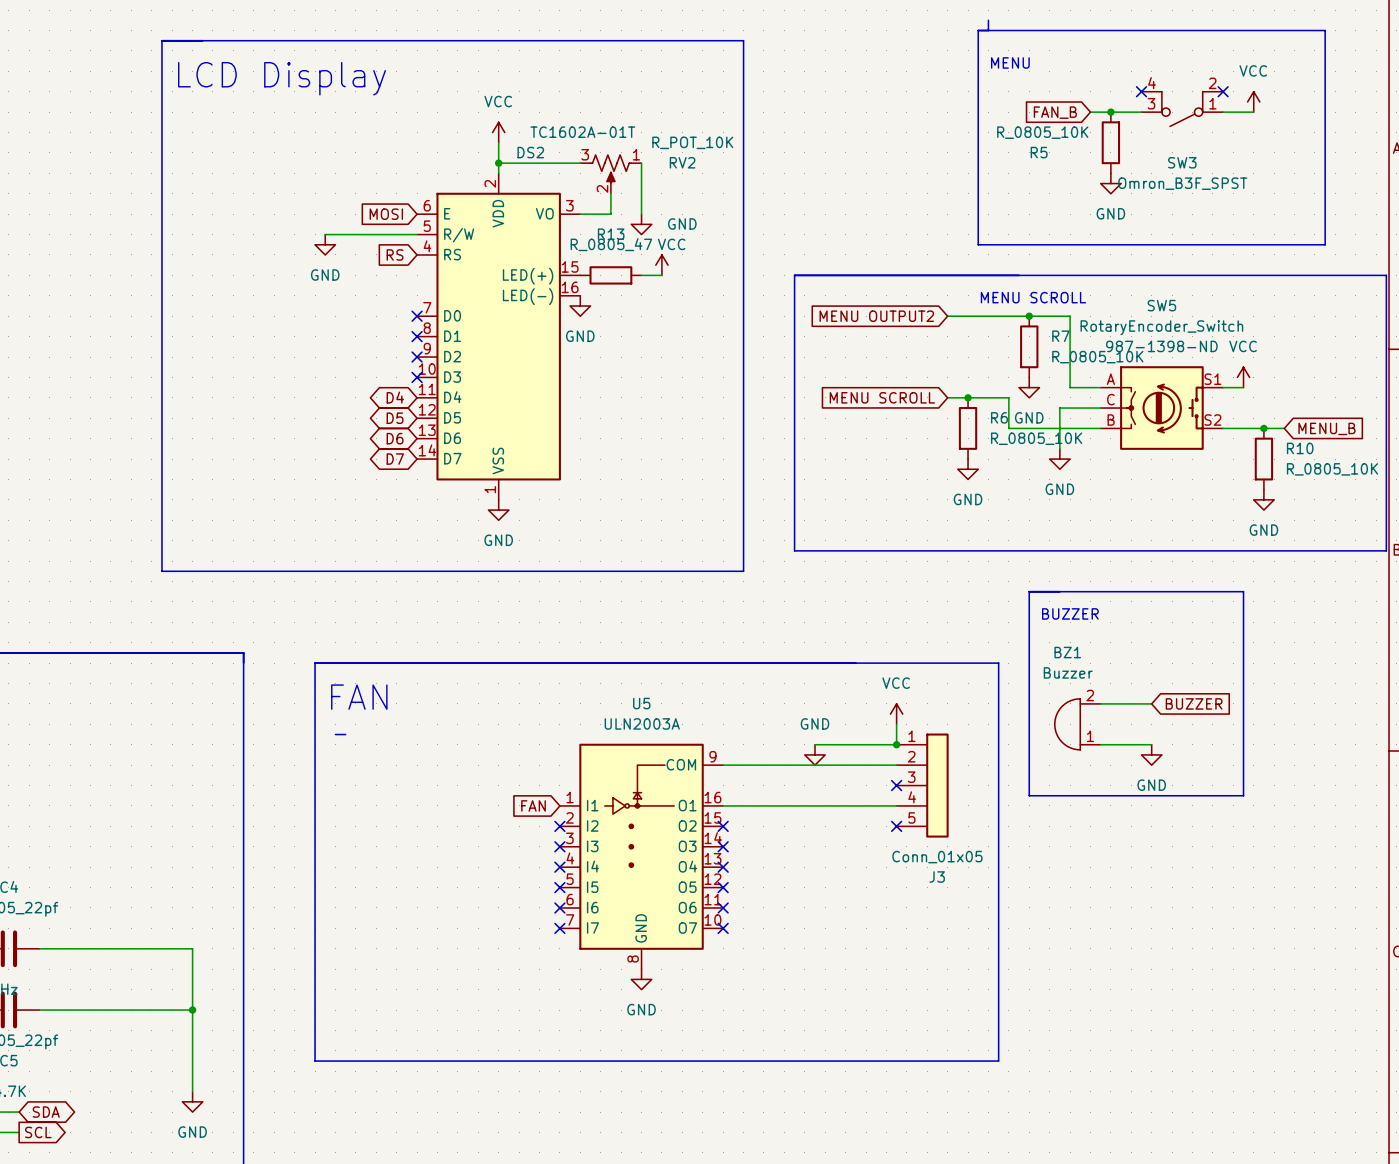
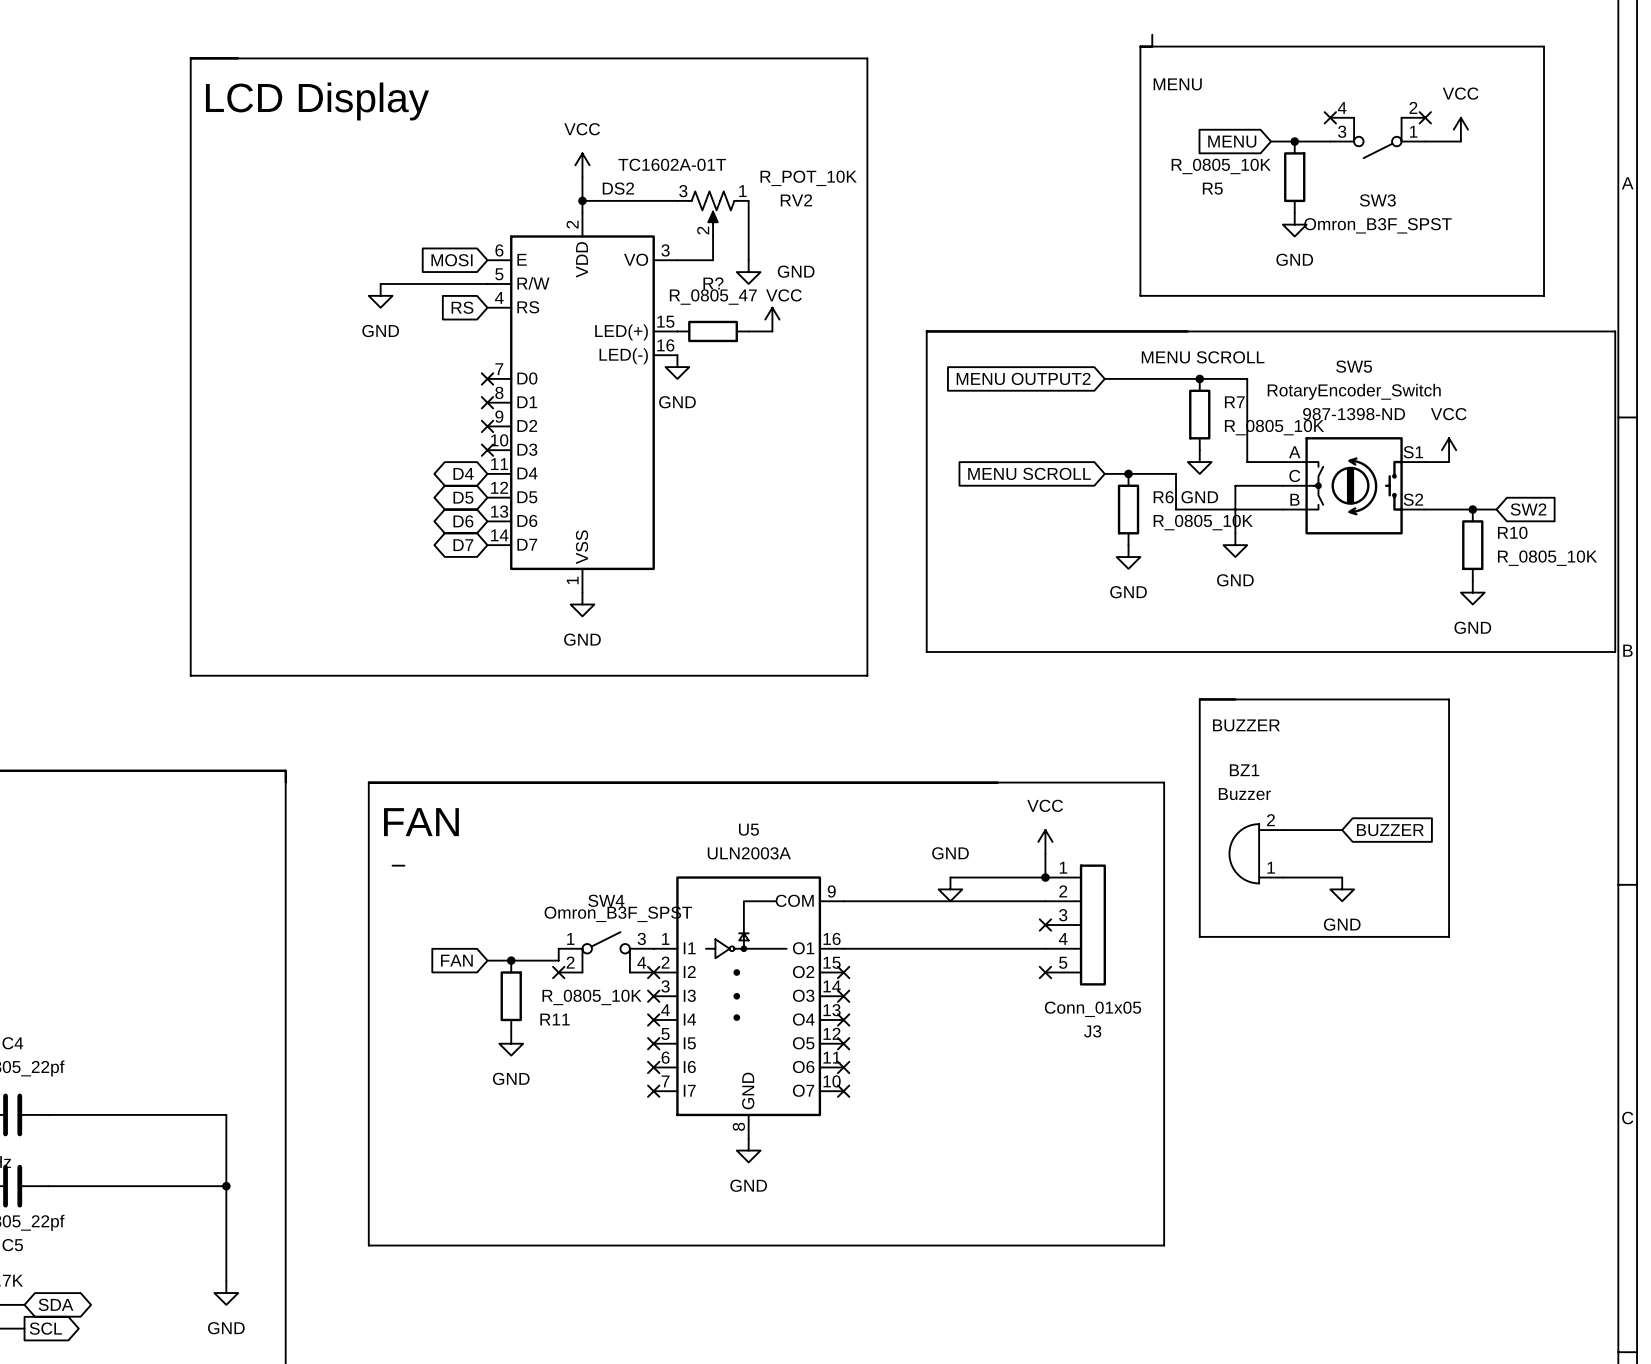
global label: FAN_B (1055, 112) -> MENU (1232, 141)
R13 name: R13 (611, 234) -> R? (713, 283)
global label: MENU_B (1326, 428) -> SW2 (1528, 509)
wire: none -> (558, 948) (558, 960) (487, 960)
global label position: FAN (533, 805) -> FAN (456, 960)
SW4: none -> Omron_B3F_SPST (606, 952)
junction: none -> (511, 960)
no-connect mark: none -> (558, 972)
R11: none -> R_0805_10K (511, 996)
power symbol: none -> GND (511, 1043)

